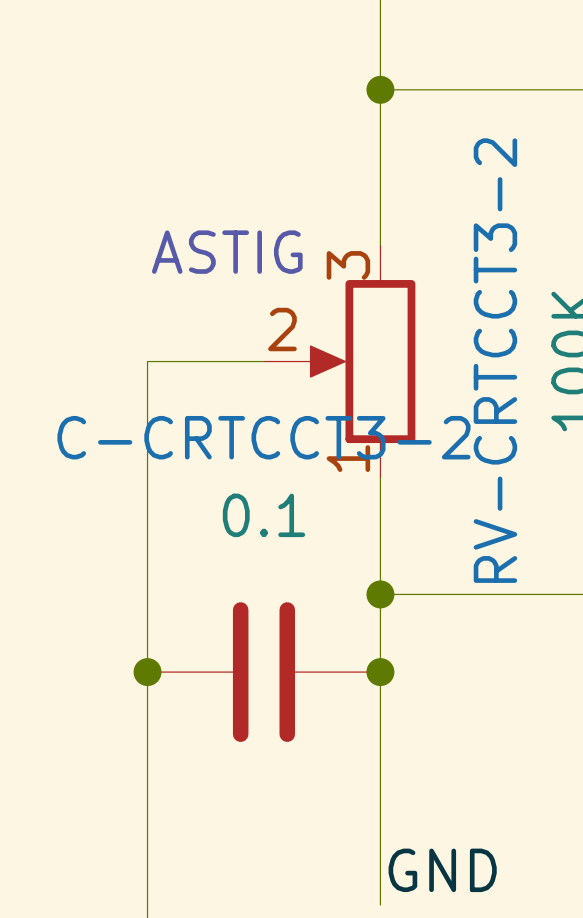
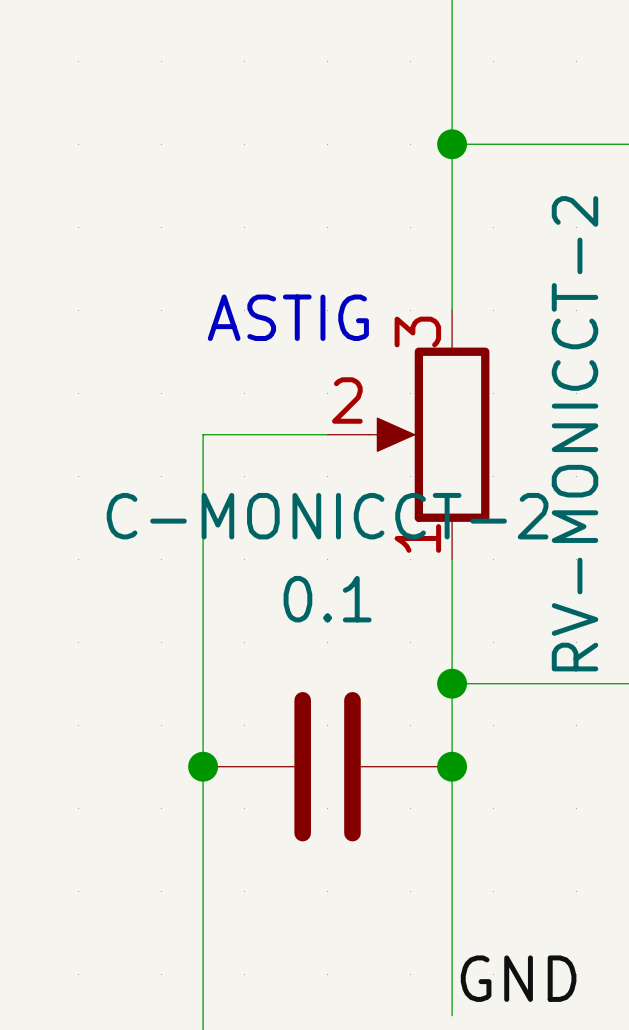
RV-CRTCCT3-2 name: RV-CRTCCT3-2 (495, 360) -> RV-MONICCT-2 (575, 433)
C-CRTCCT3-2 name: C-CRTCCT3-2 (263, 437) -> C-MONICCT-2 (327, 516)

